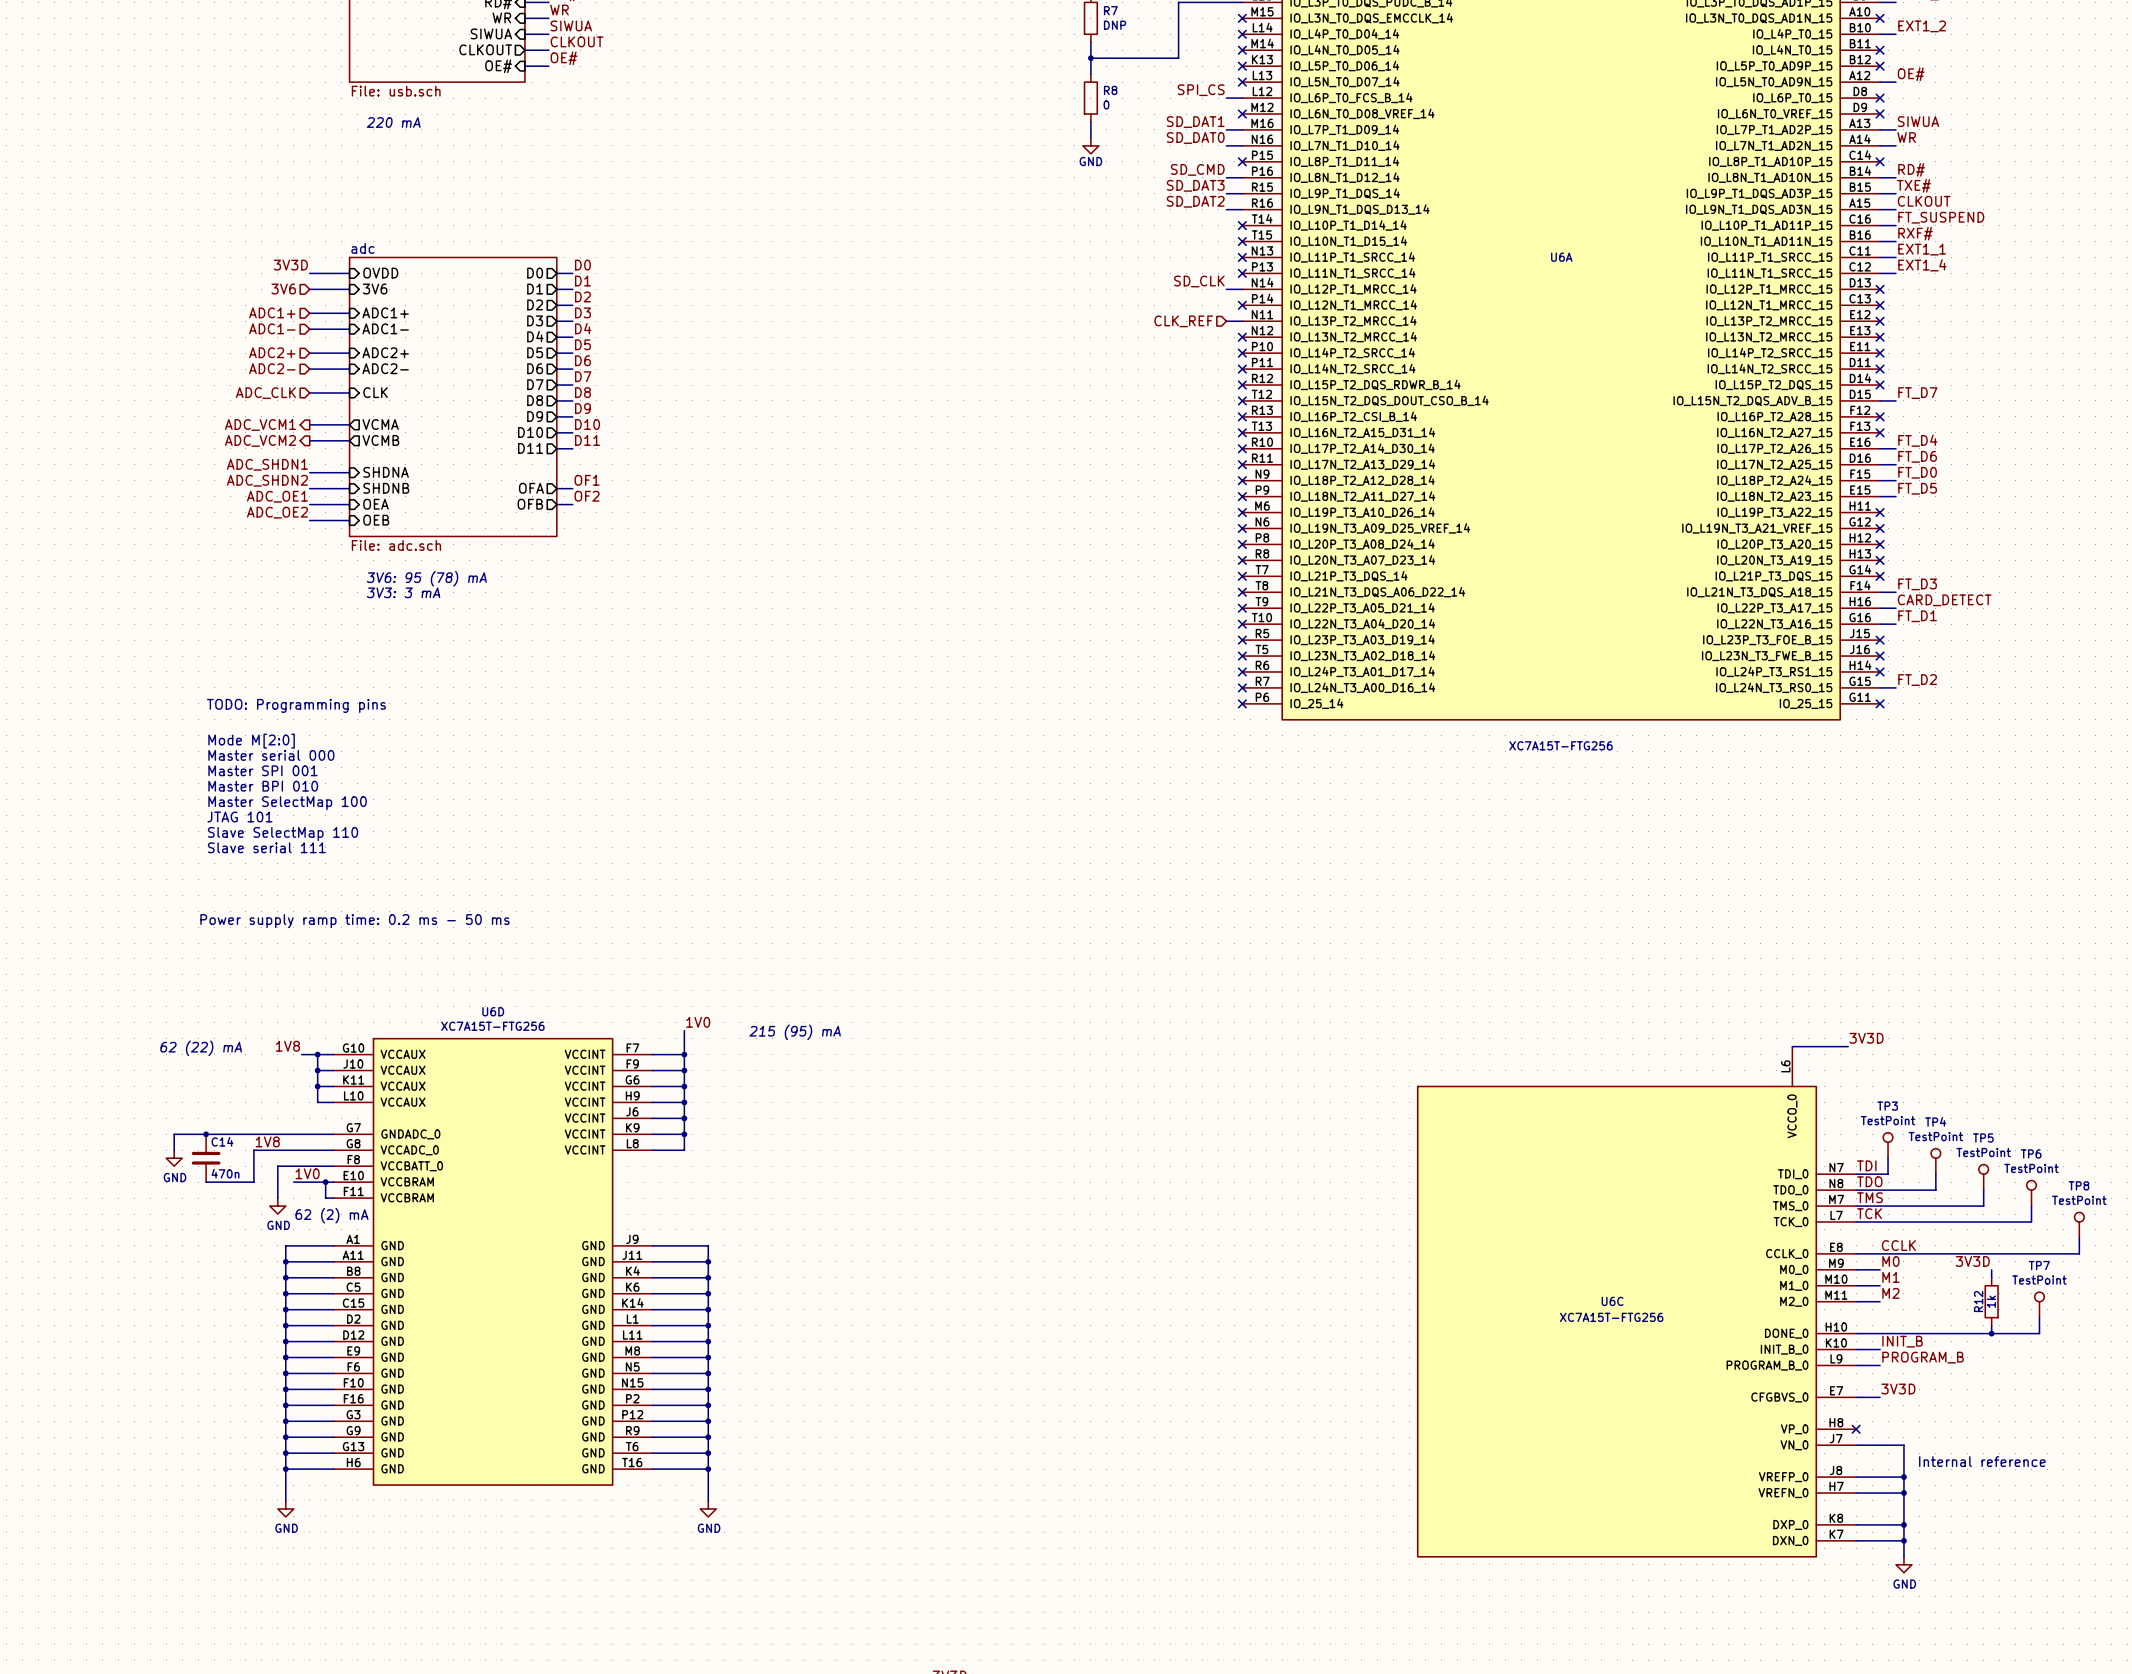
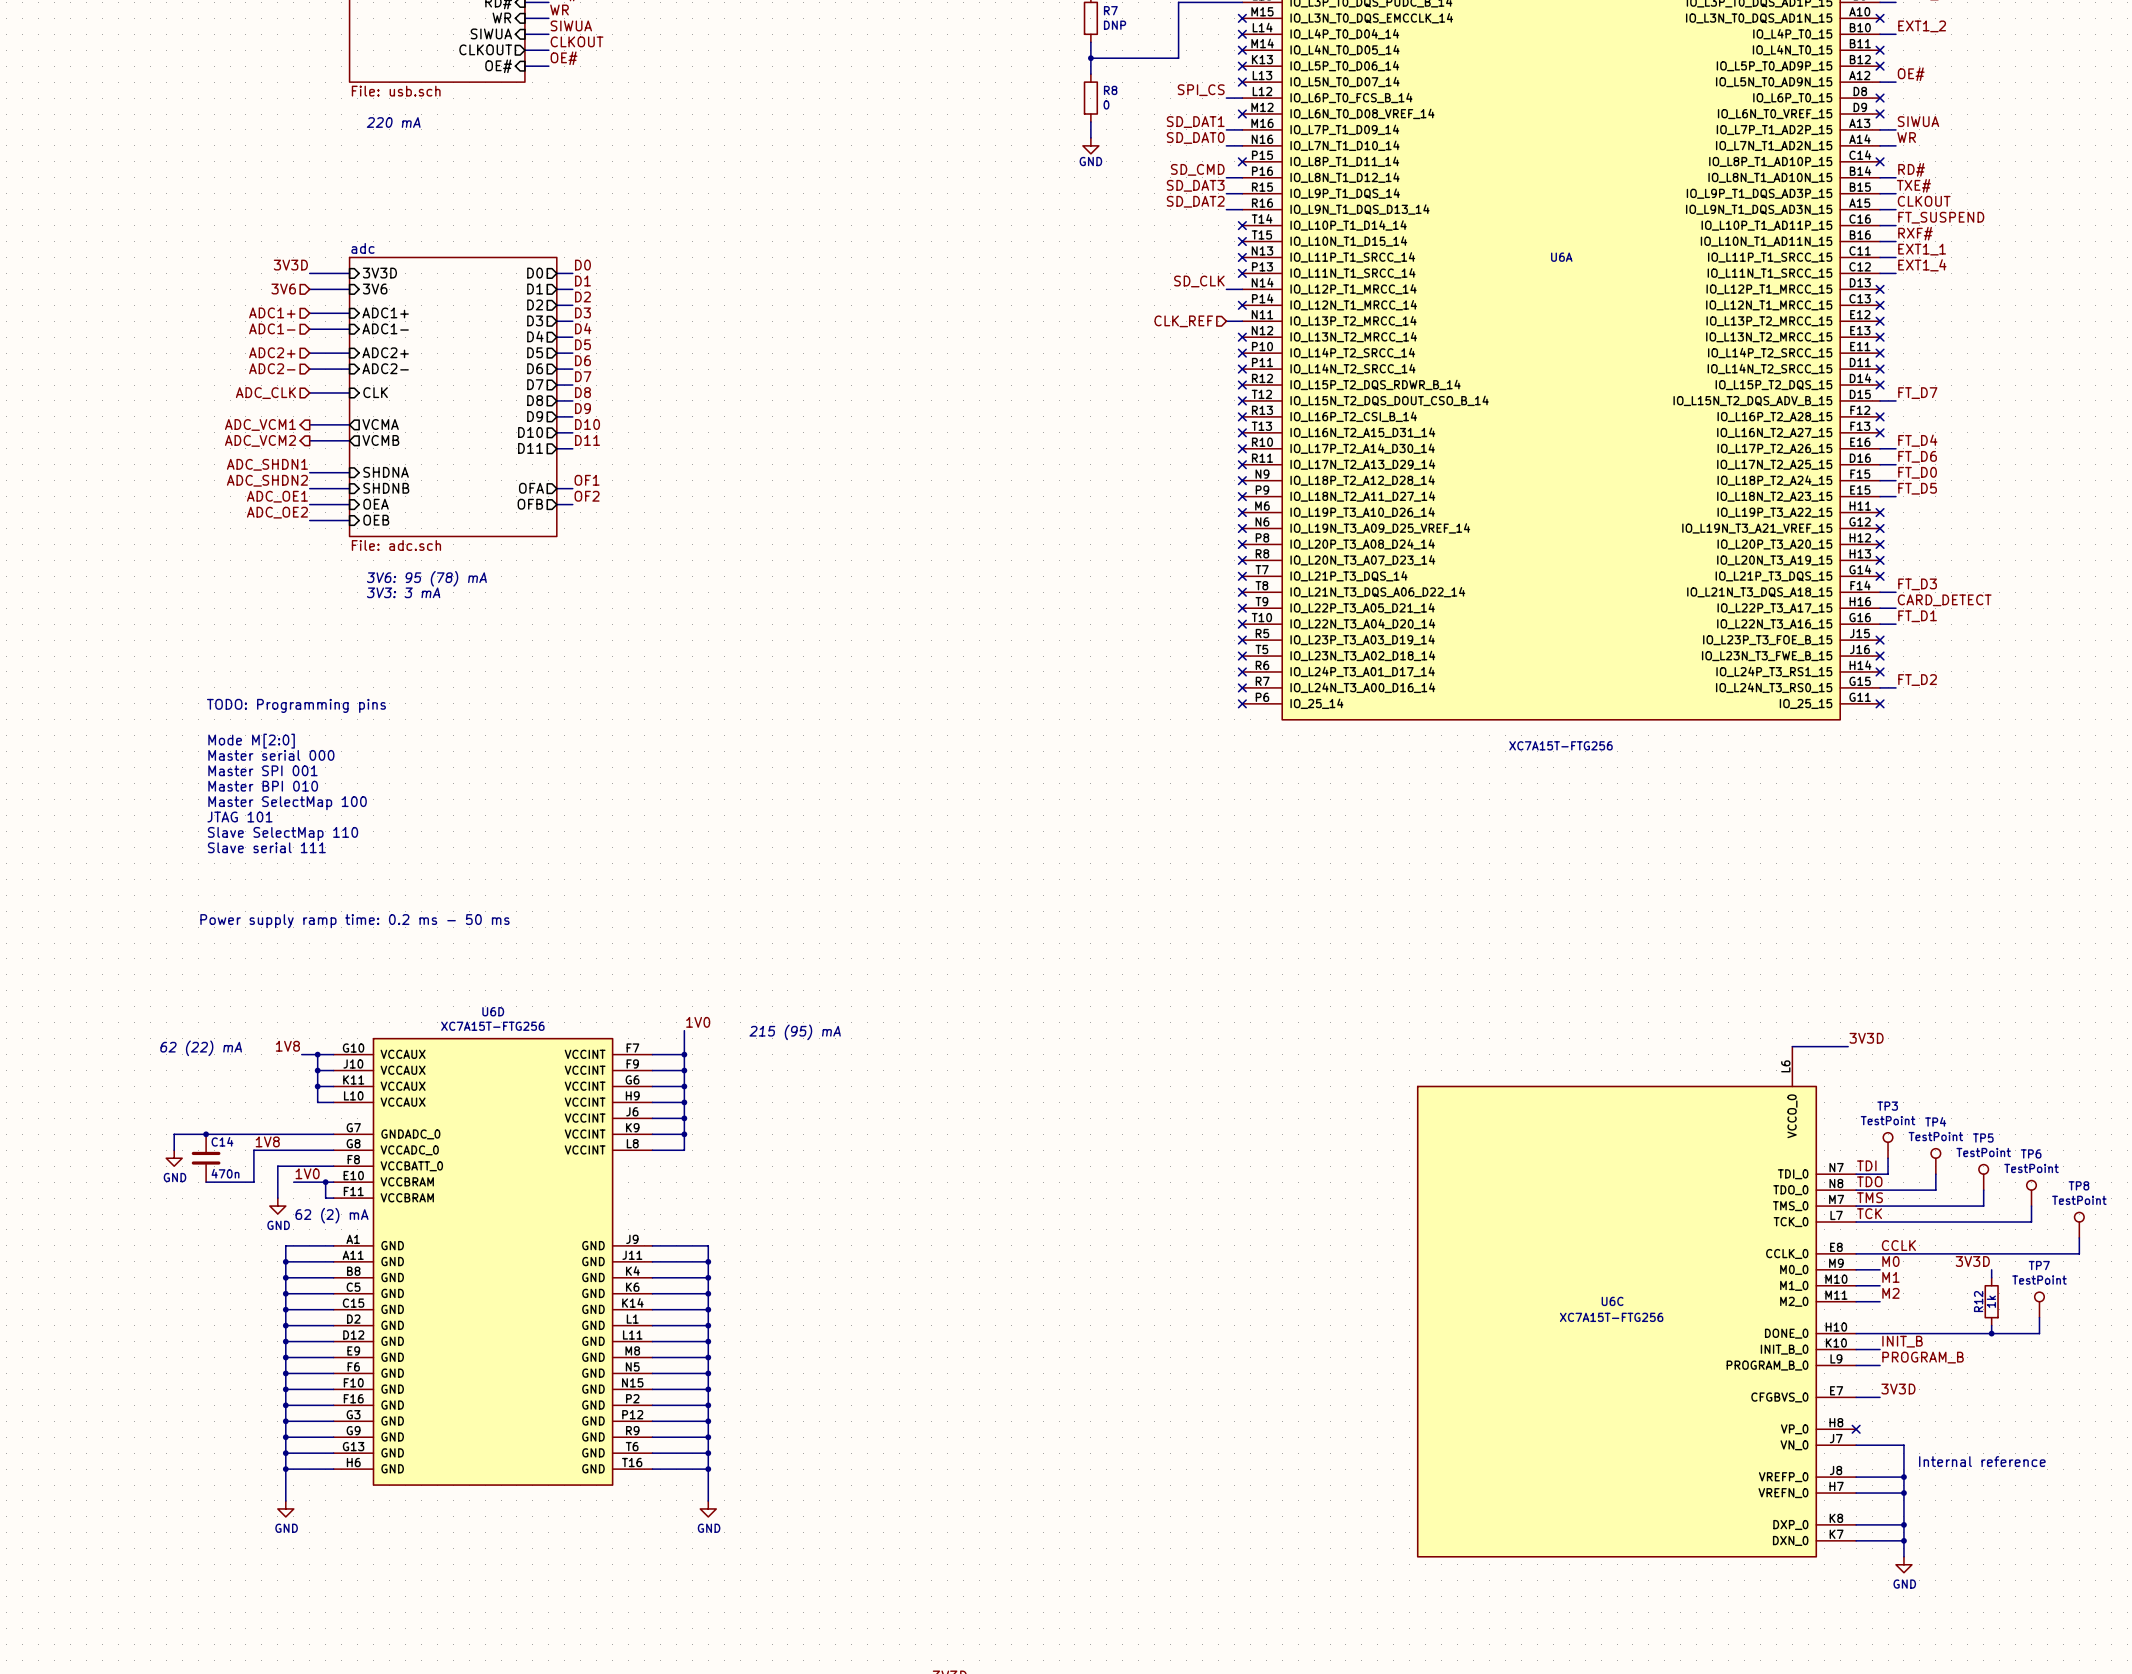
sheet pin: OVDD (380, 273) -> 3V3D (379, 273)

